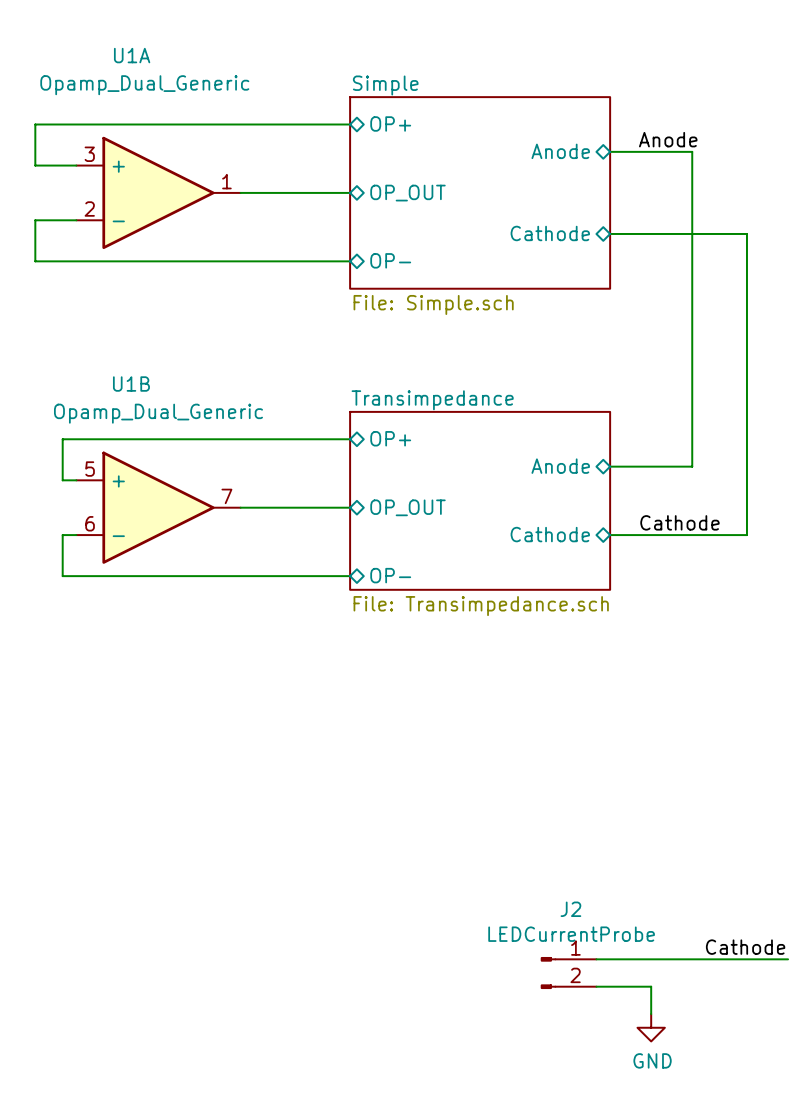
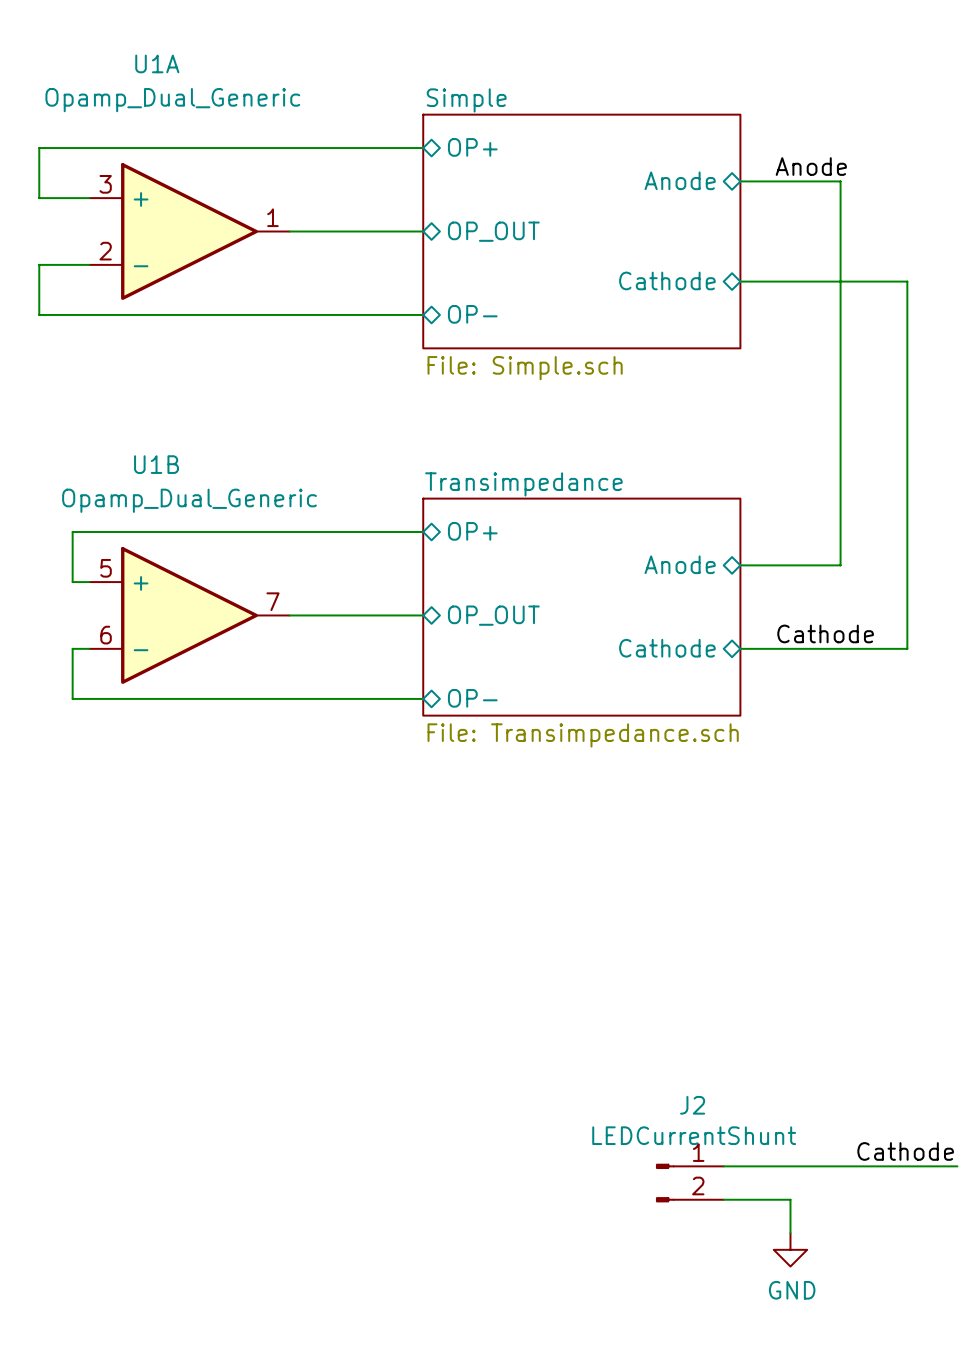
J2 value: LEDCurrentProbe (571, 934) -> LEDCurrentShunt (694, 1135)

